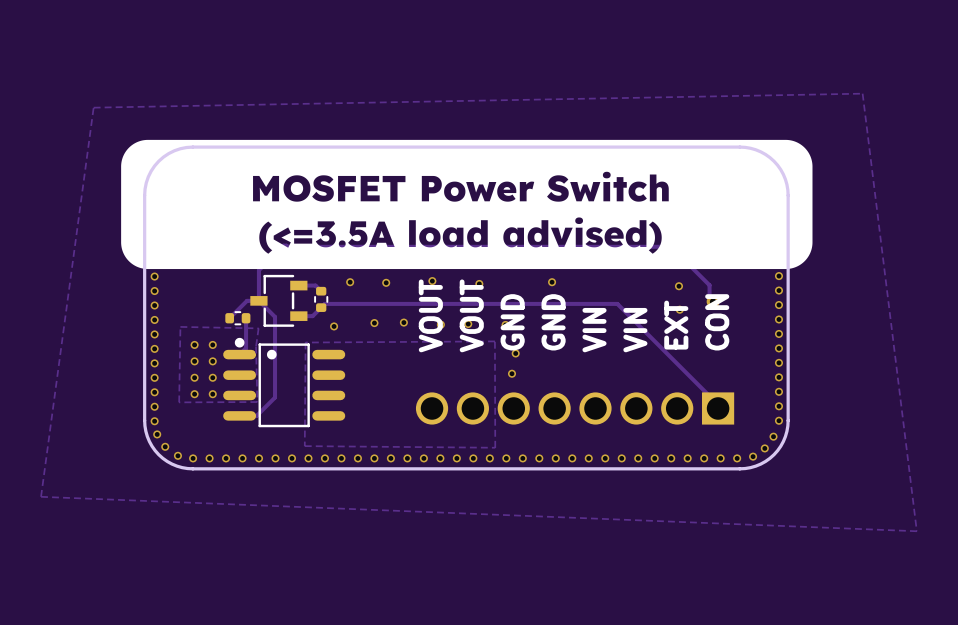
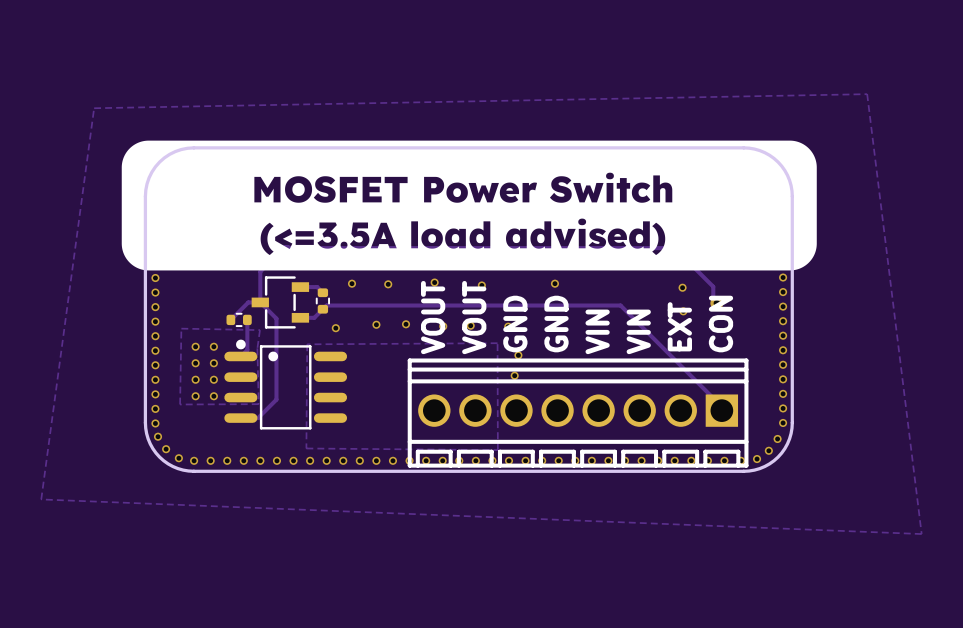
part footprint: [415, 392, 735, 425] -> [407, 358, 749, 468]

